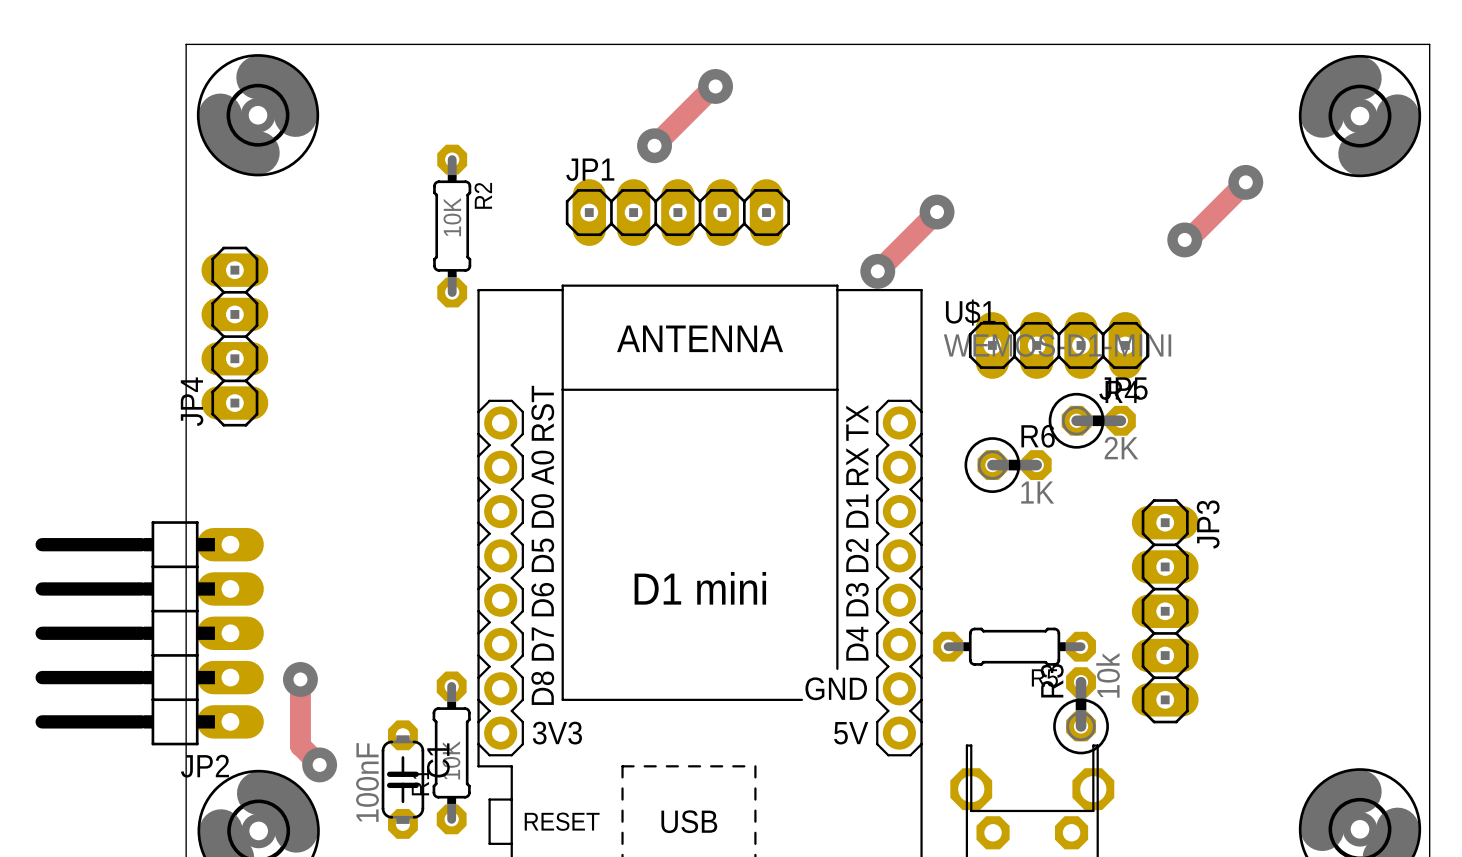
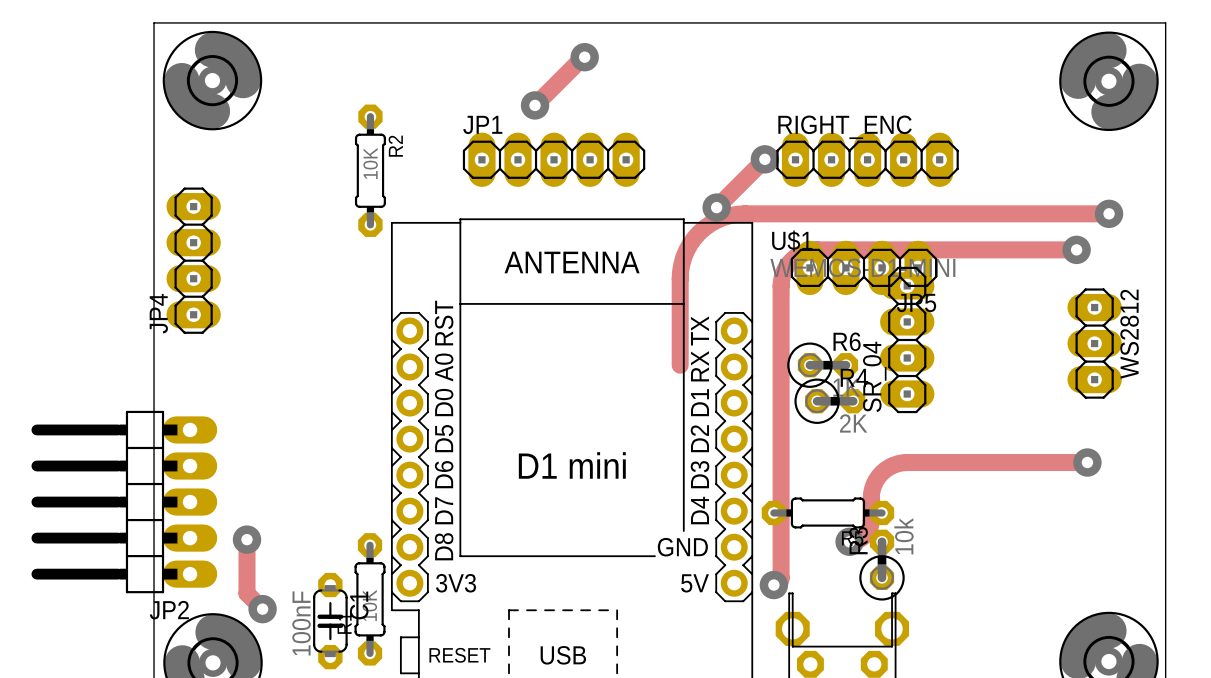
track: (1245, 182) (1188, 239) (1184, 239) -> none
via: (1245, 182) -> none
RIGHT_ENC: none -> (867, 159)
via: (1184, 239) -> none
via: none -> (1109, 213)
track: none -> (1112, 213) (745, 213) (723, 217) (710, 223) (699, 232) (690, 244) (683, 257) (680, 278) (680, 365)
track: none -> (1076, 249) (817, 249) (803, 252) (791, 260) (783, 272) (781, 285) (781, 577) (778, 582) (773, 585)
via: none -> (1076, 249)
R4 position: (1092, 420) -> (829, 401)
SR_04: none -> (907, 339)
WS2812: none -> (1094, 343)
track: none -> (1087, 462) (897, 463) (881, 473) (873, 484) (871, 493) (871, 523) (868, 530) (860, 538) (849, 541)
via: none -> (1087, 462)
JP3: (1165, 611) -> none
via: none -> (849, 541)
via: none -> (773, 585)

